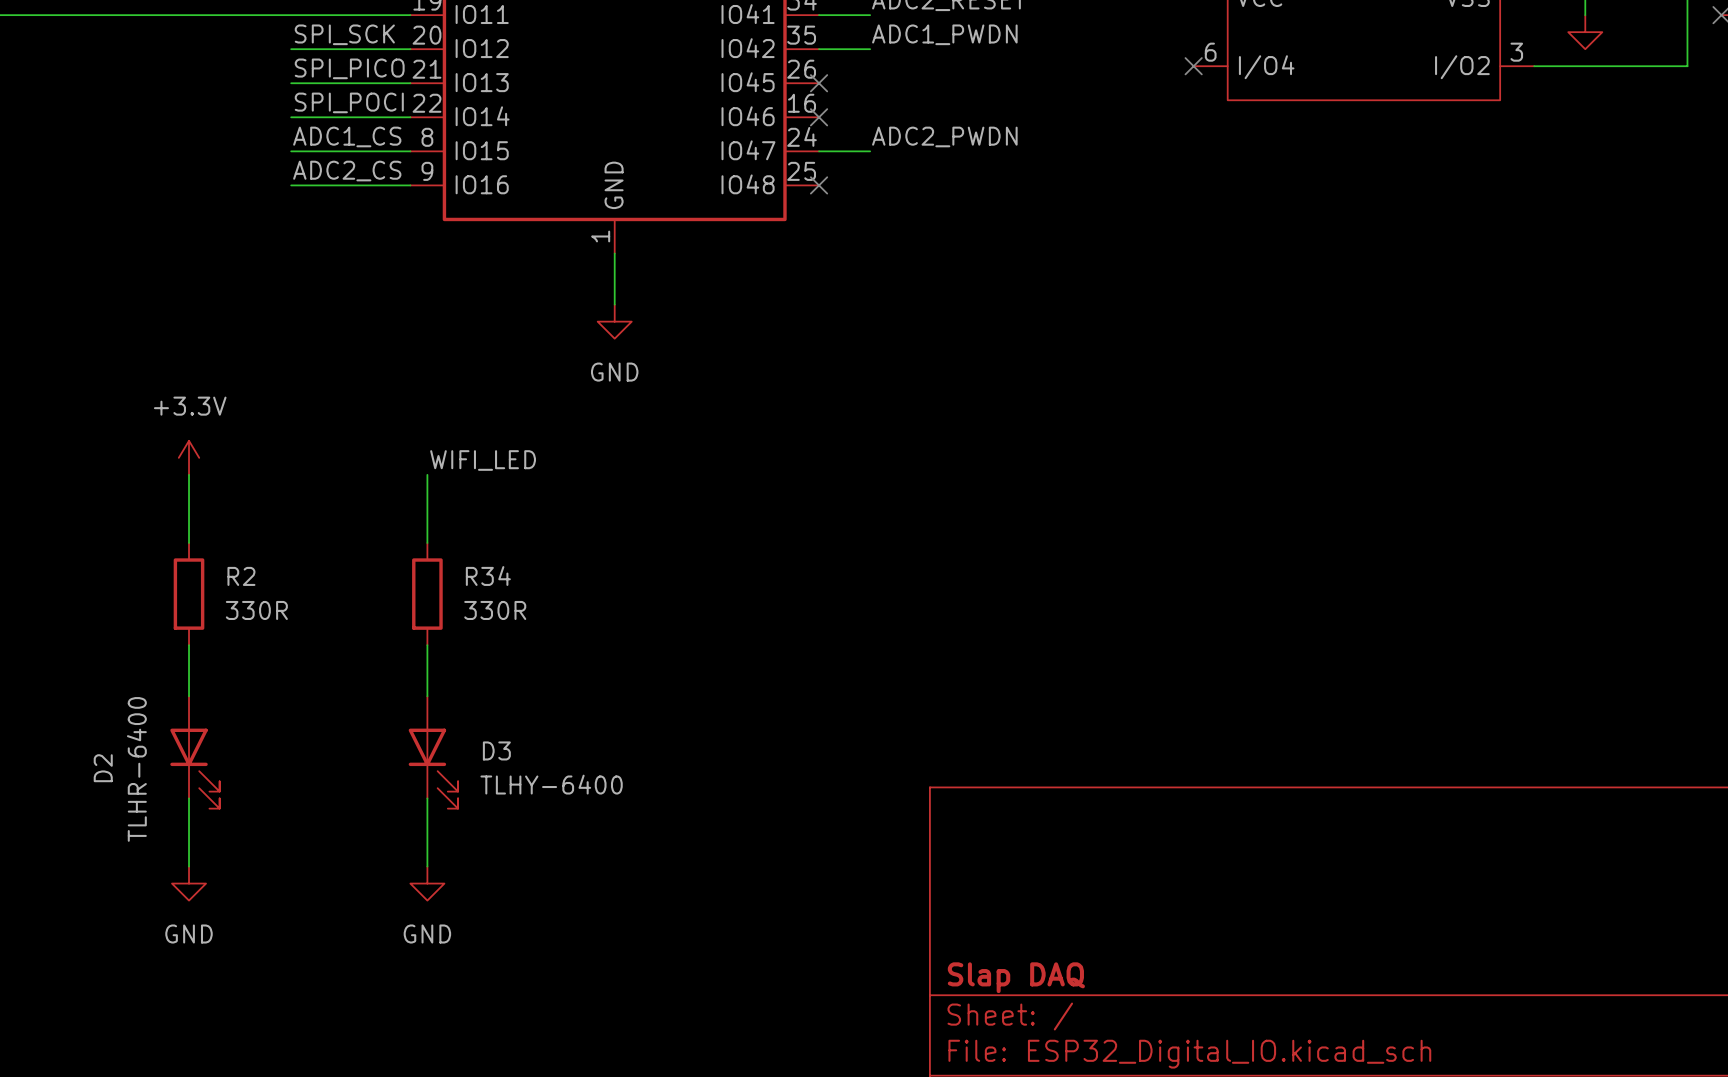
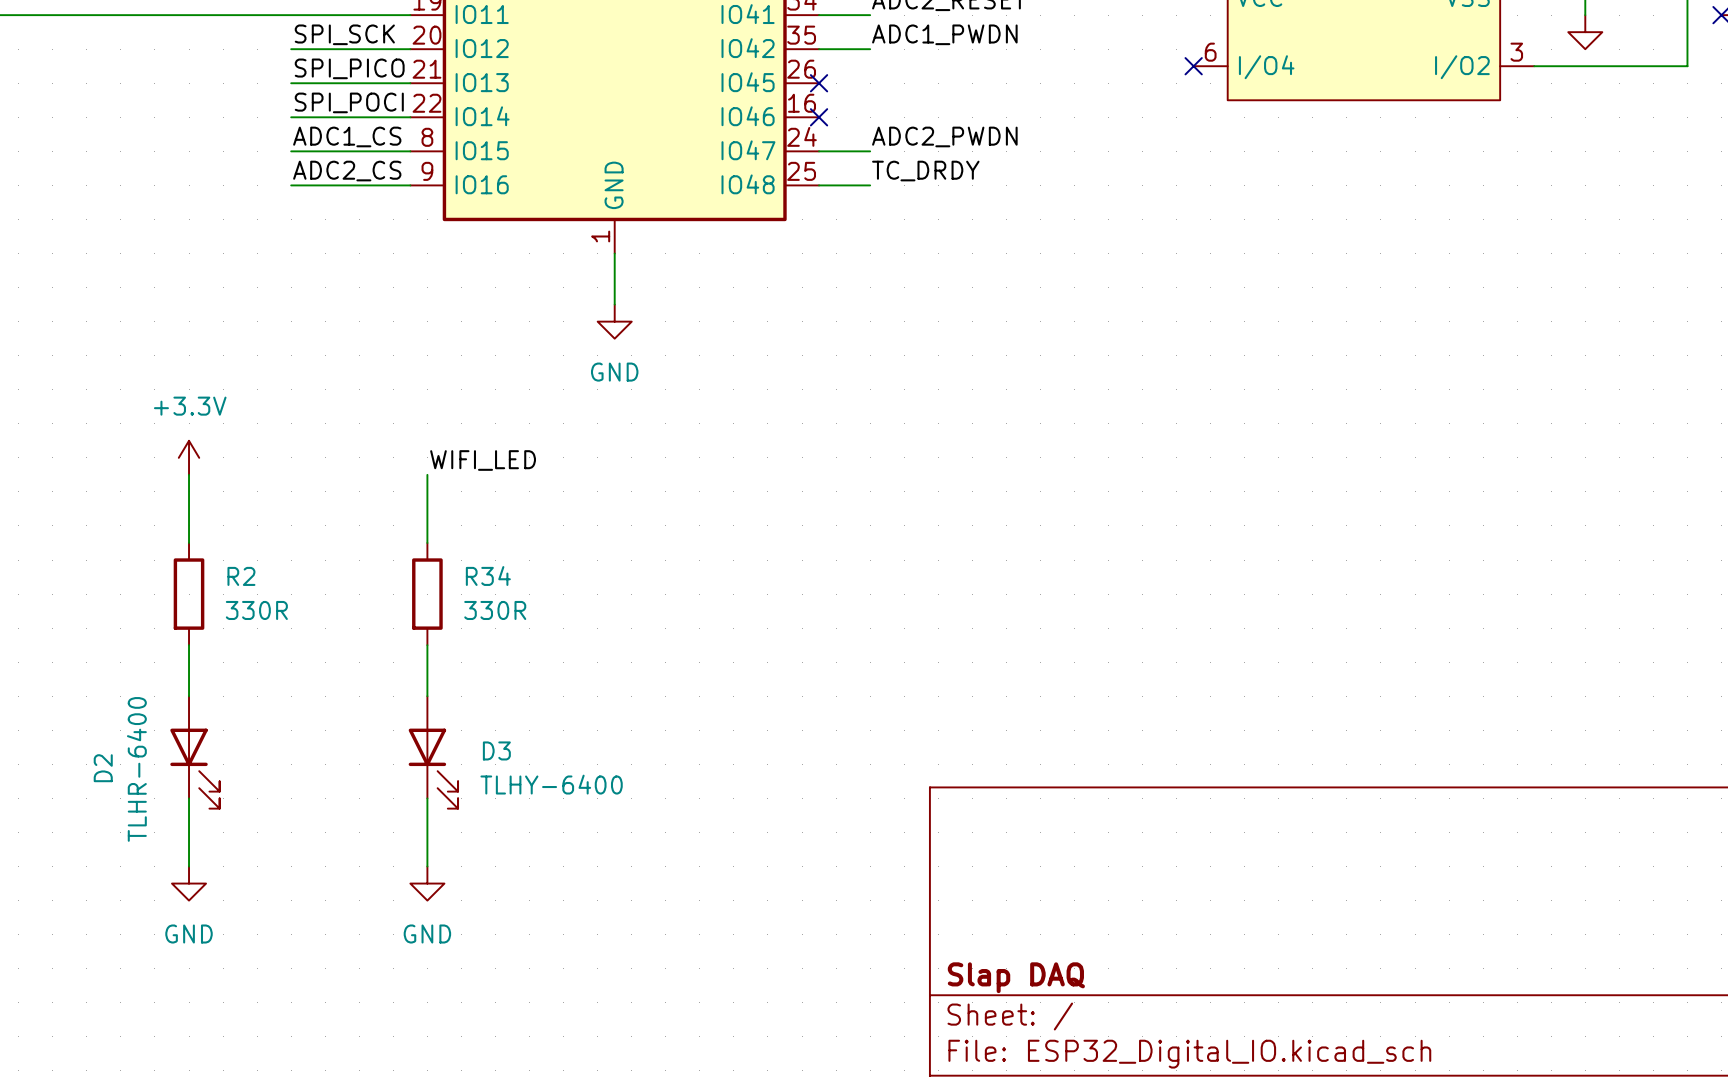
label: none -> TC_DRDY (925, 171)
wire: none -> (819, 185) (870, 185)
no-connect mark: (819, 185) -> none

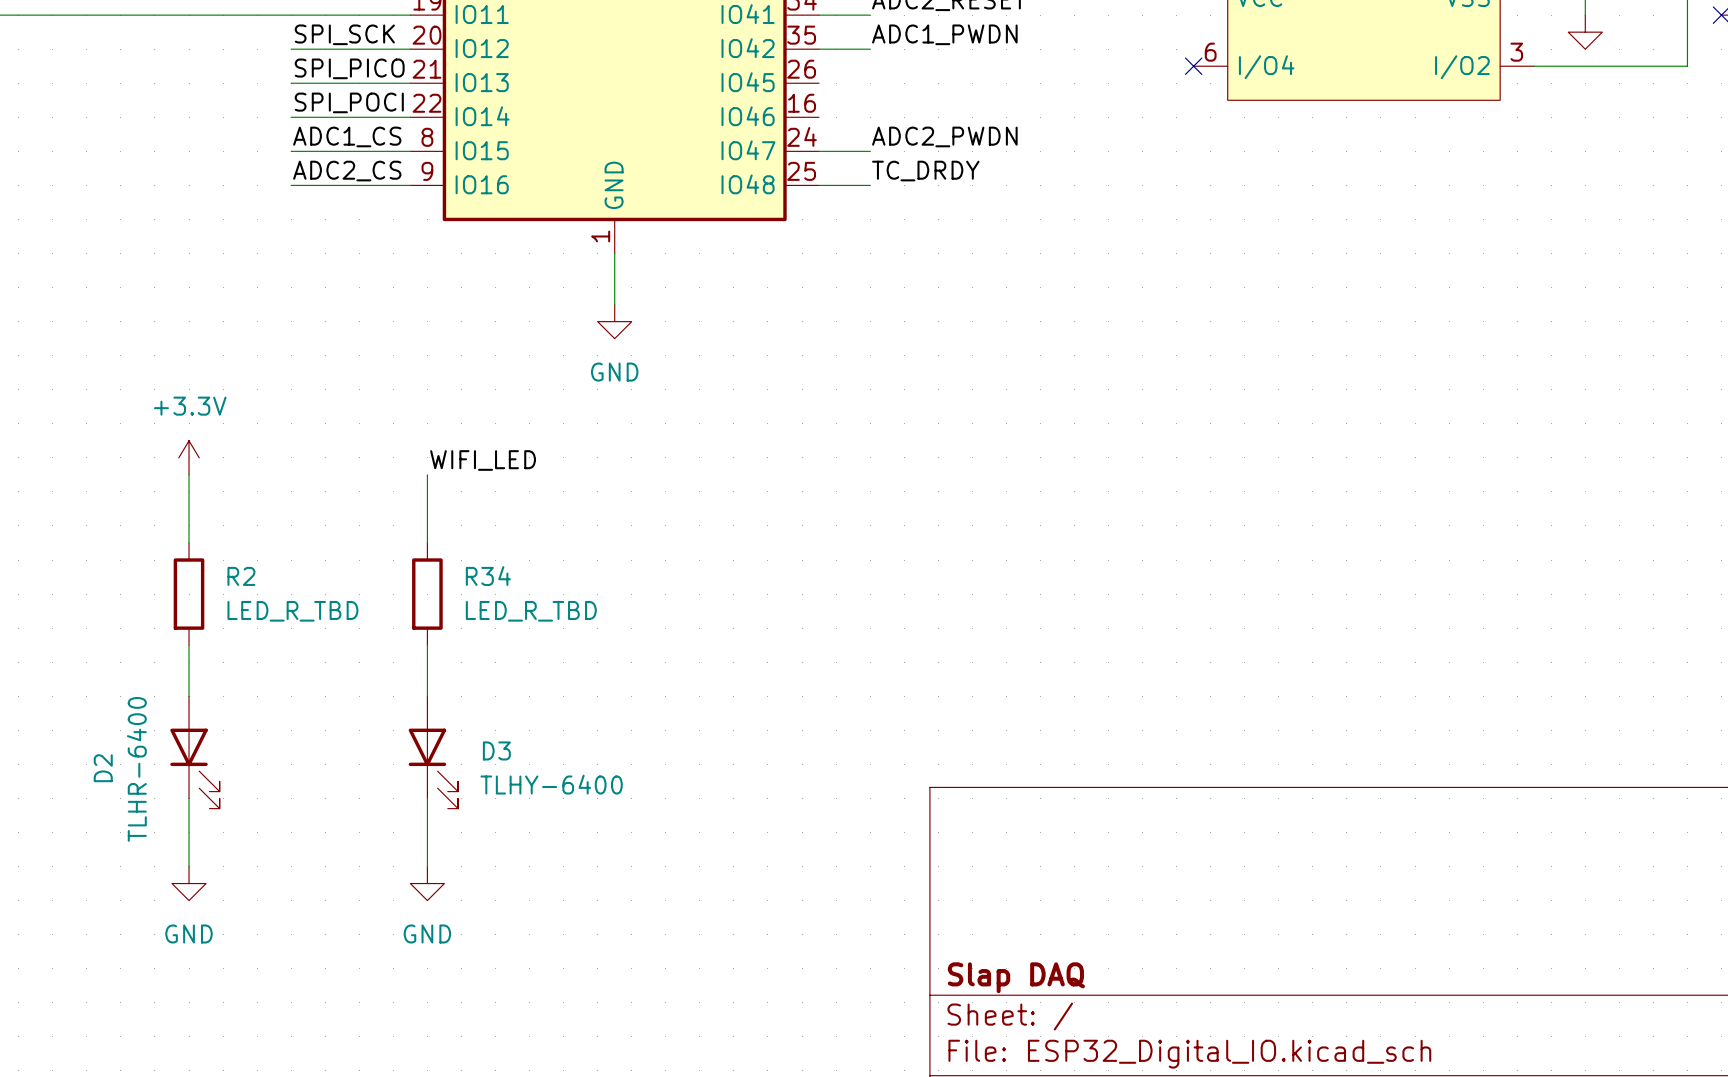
no-connect mark: (819, 83) -> none
no-connect mark: (819, 117) -> none
R2 value: 330R (256, 610) -> LED_R_TBD (292, 611)
R34 value: 330R (495, 610) -> LED_R_TBD (531, 611)

